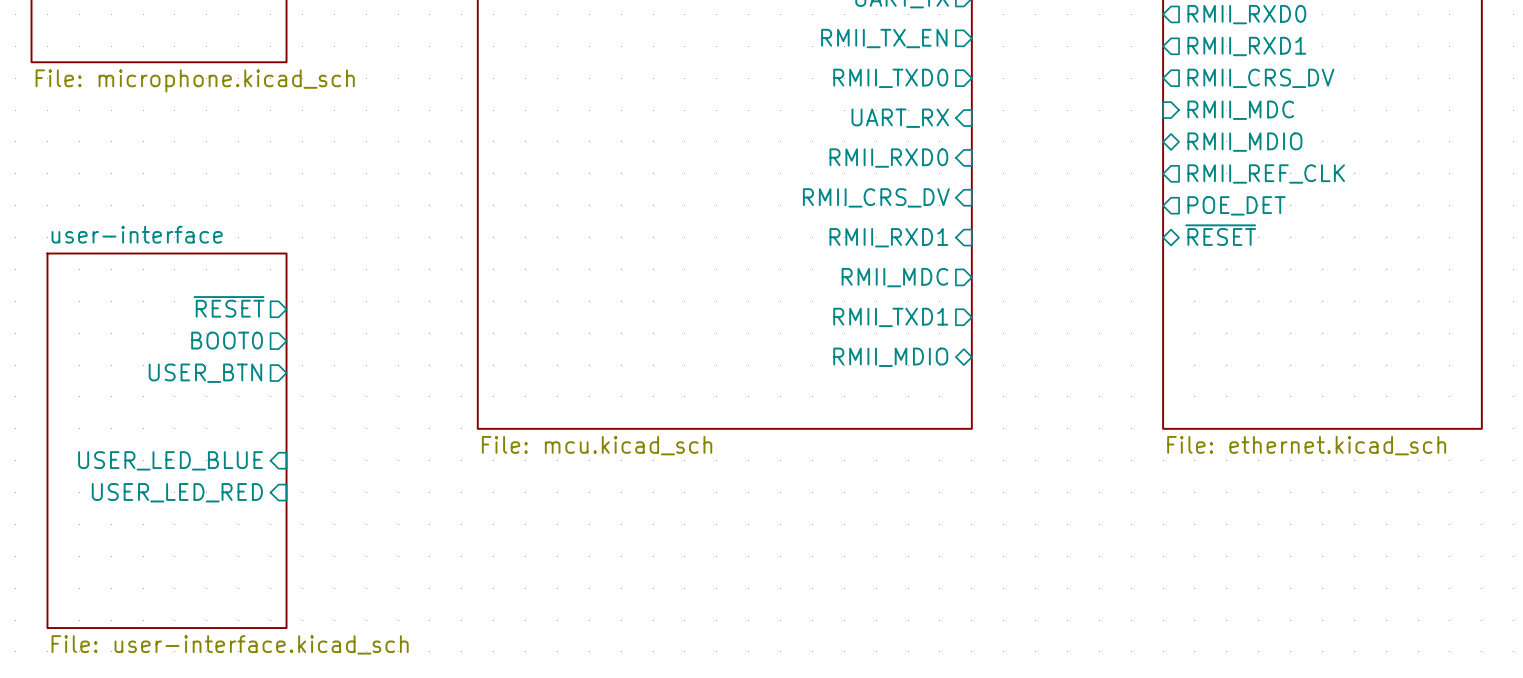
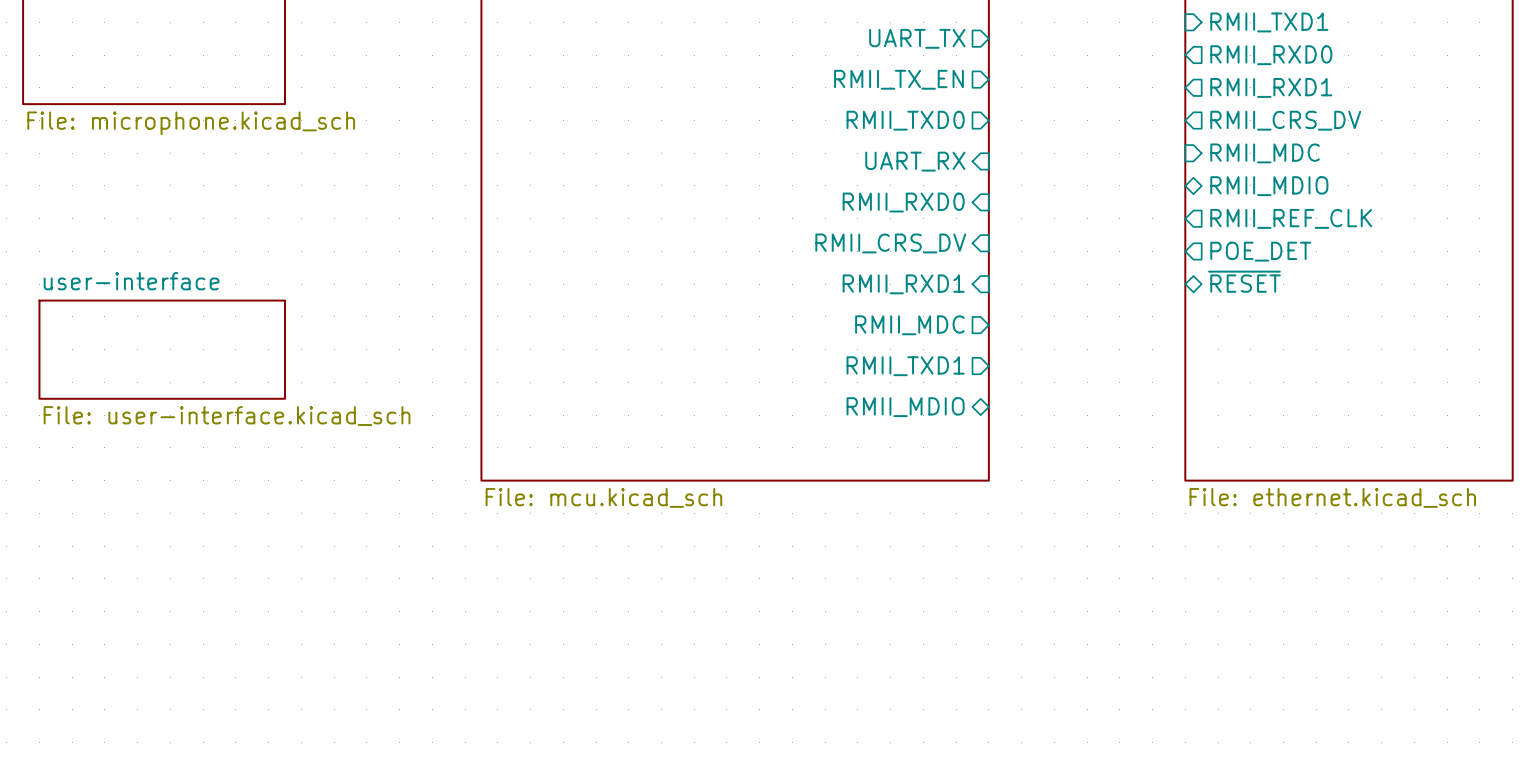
sheet user-interface: none -> File: user-interface.kicad_sch (162, 349)
sheet pin: ~{RESET} (229, 306) -> none
sheet pin: BOOT0 (227, 340) -> none
sheet pin: USER_BTN (205, 373) -> none
sheet user-interface: File: user-interface.kicad_sch (166, 440) -> none
sheet pin: USER_LED_BLUE (170, 460) -> none
sheet pin: USER_LED_RED (177, 492) -> none

